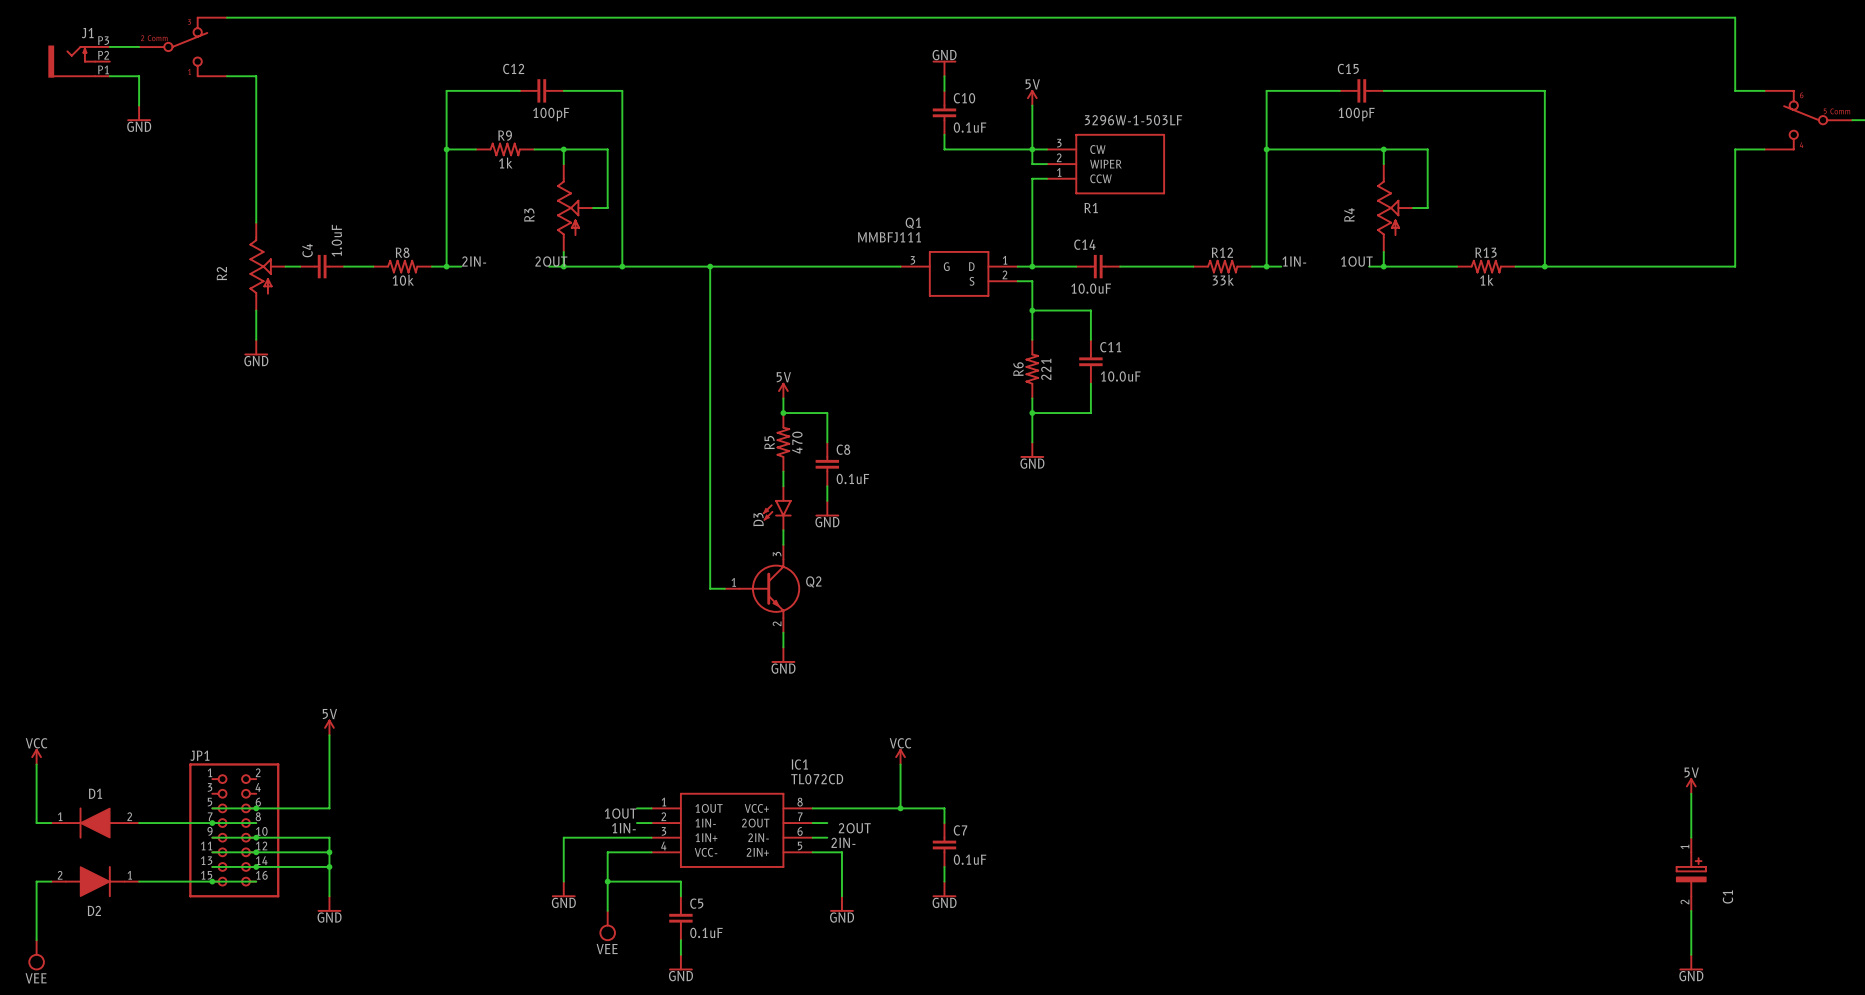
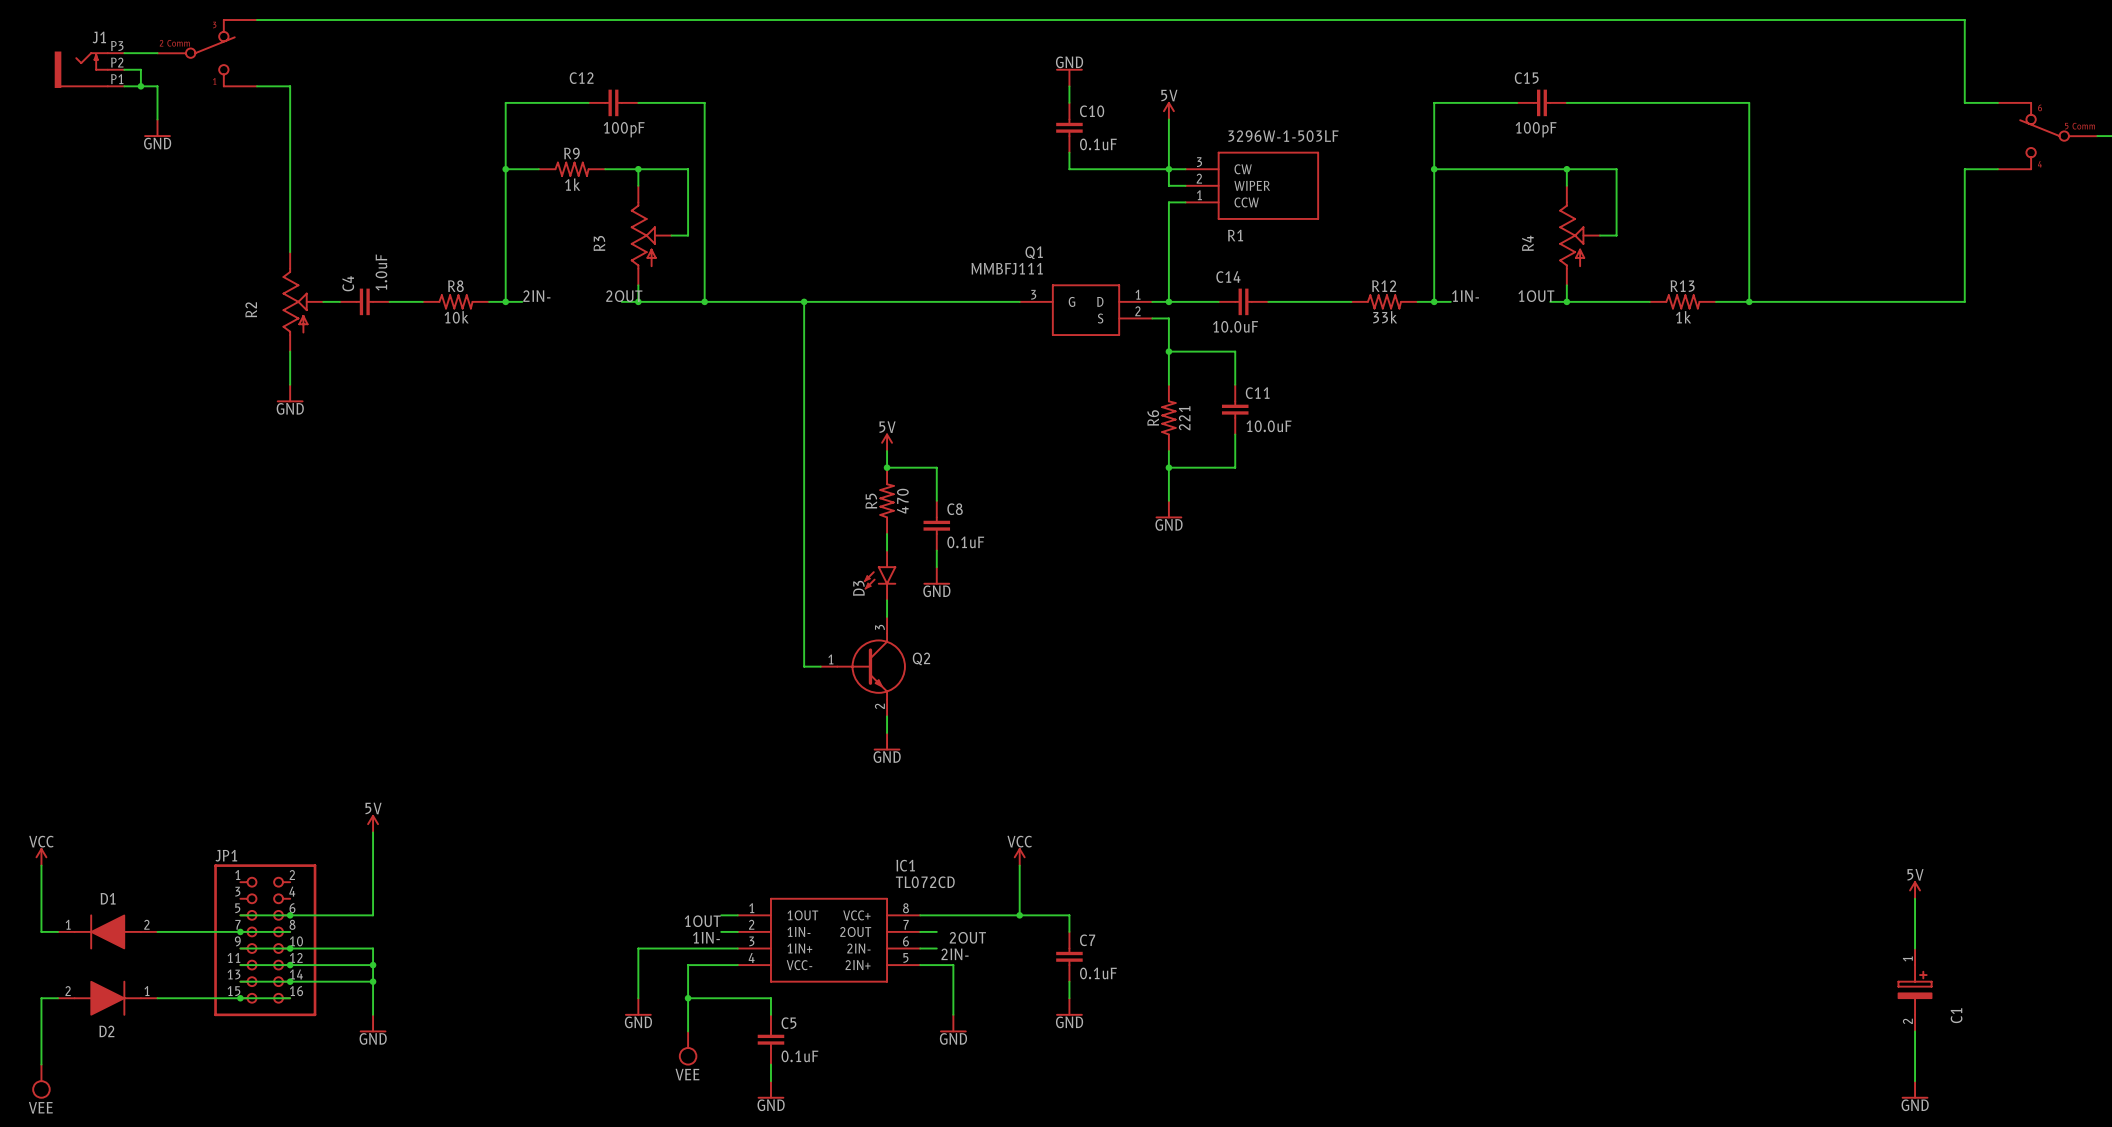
wire: none -> (124, 69) (140, 69) (140, 86)
junction: none -> (140, 86)

